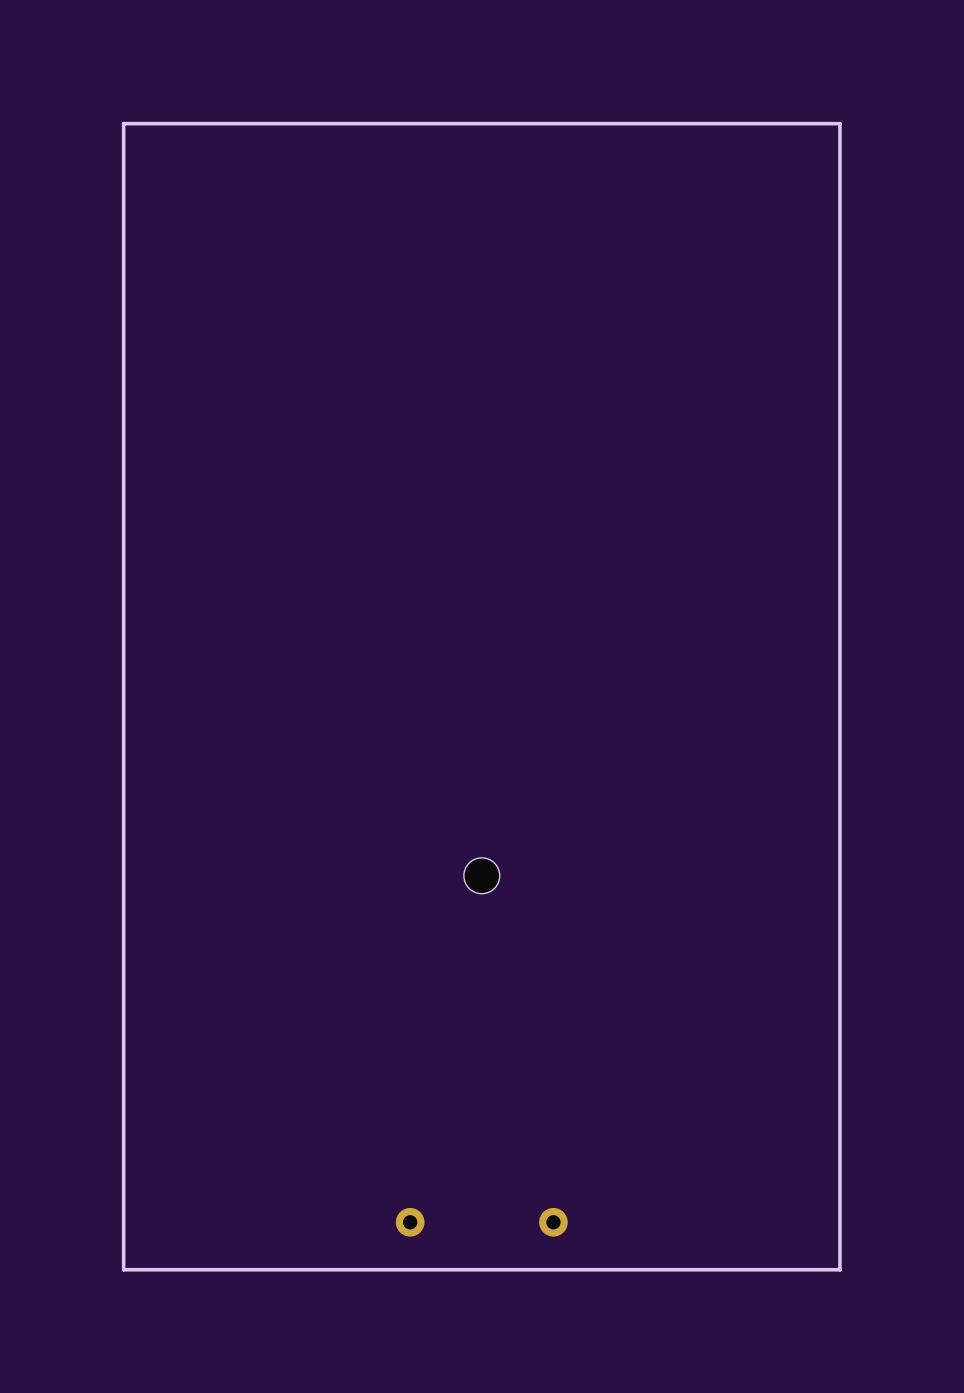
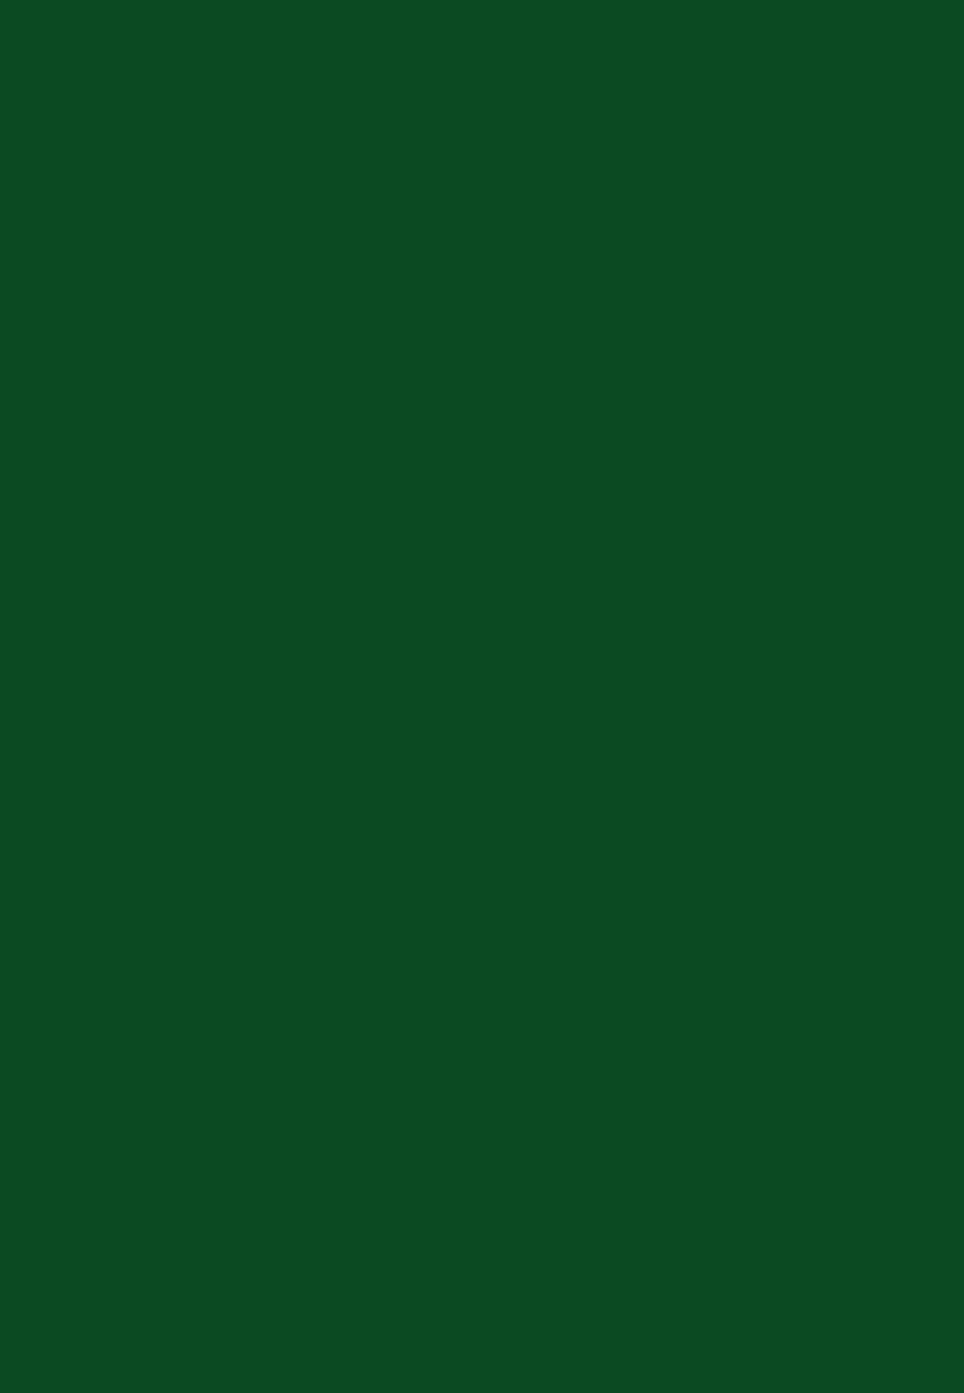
board edge: (839, 123) (123, 123) (123, 1269) (839, 1269) (839, 123) -> none
part: (481, 875) -> none
via: (410, 1222) -> none
via: (553, 1222) -> none

